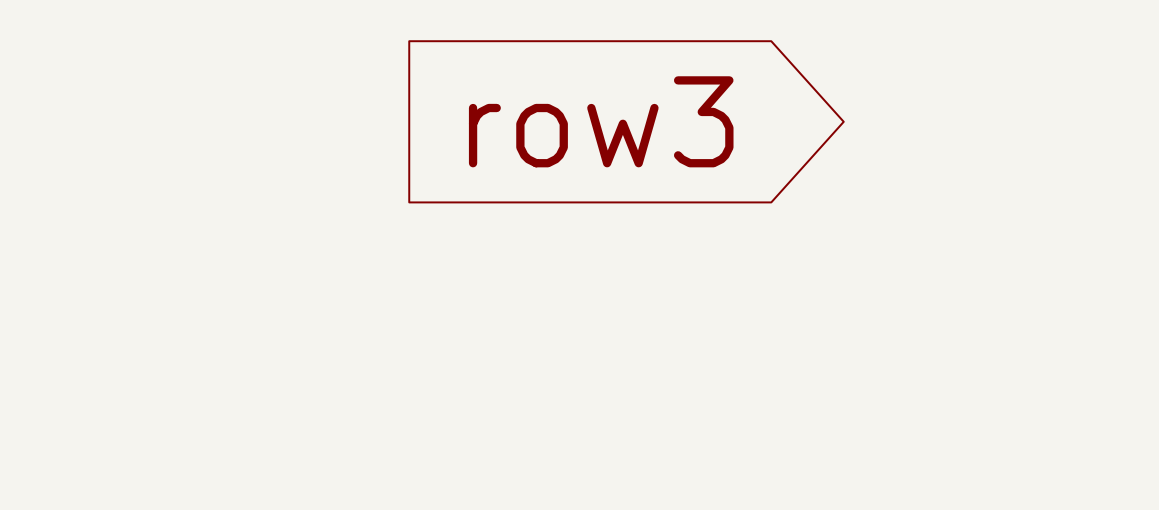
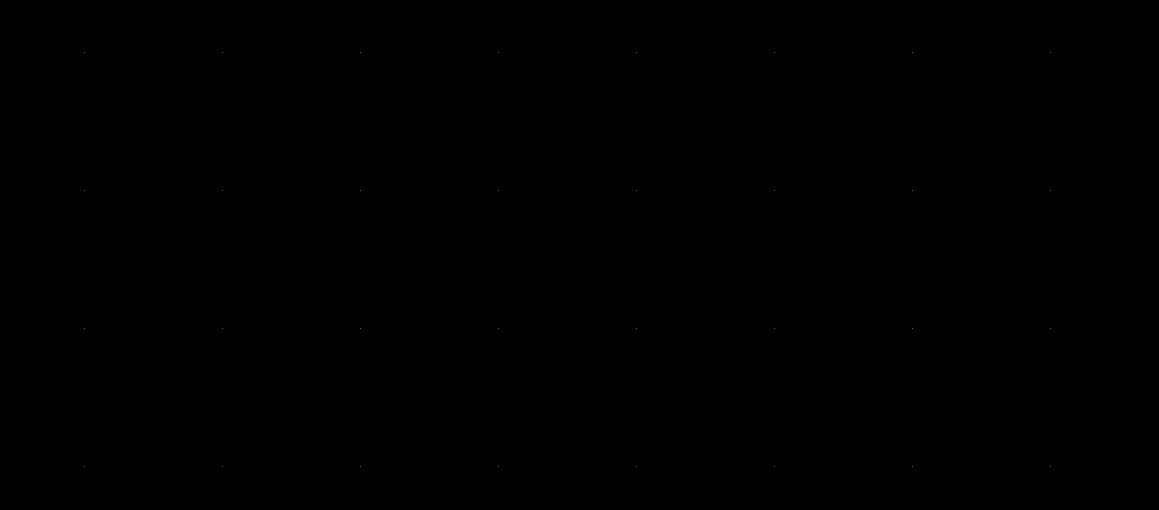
global label: row3 (601, 121) -> none

